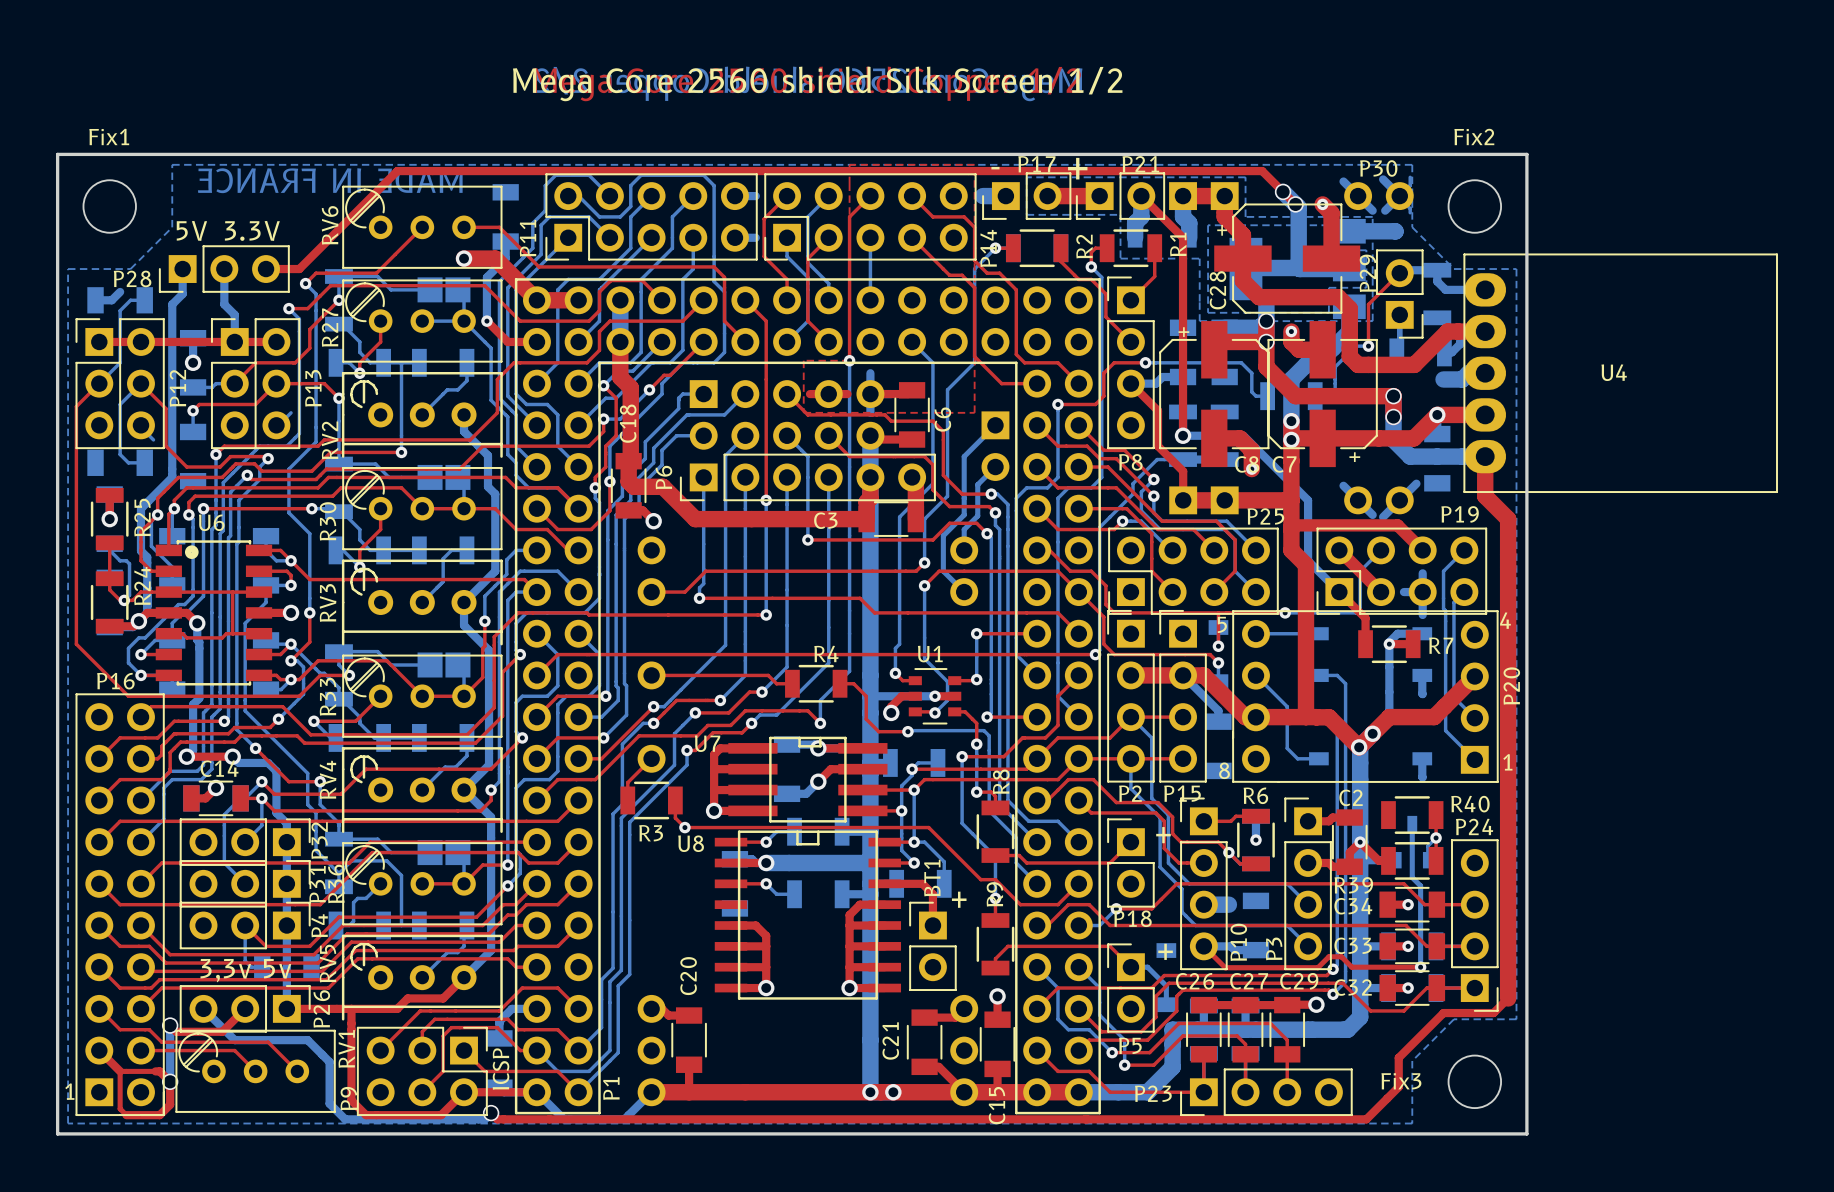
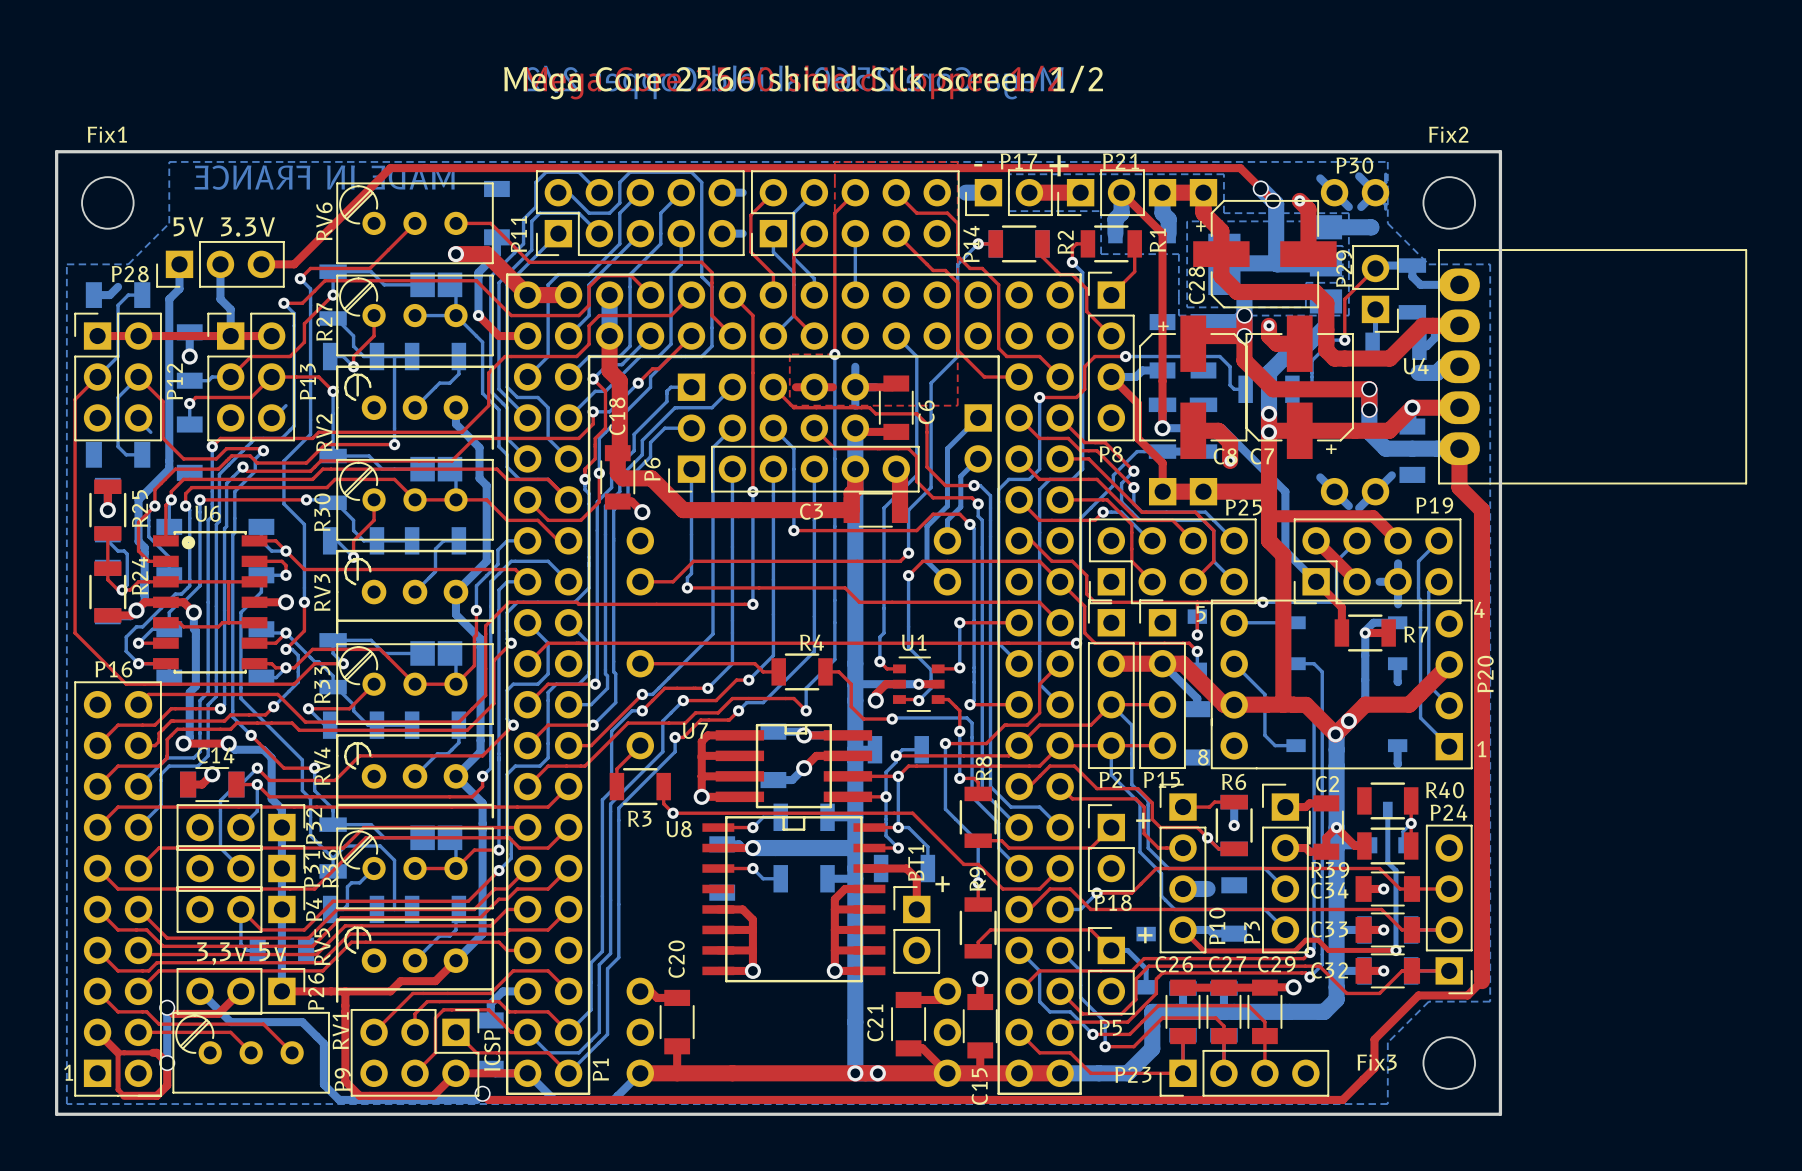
U4 name position: U4 (1614, 372) -> U4 (1416, 366)

